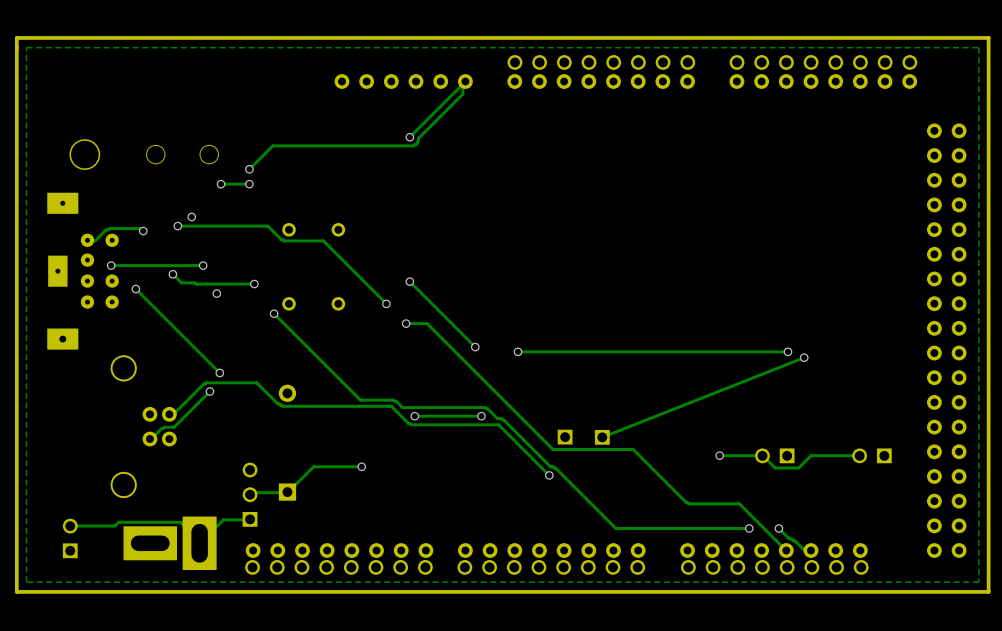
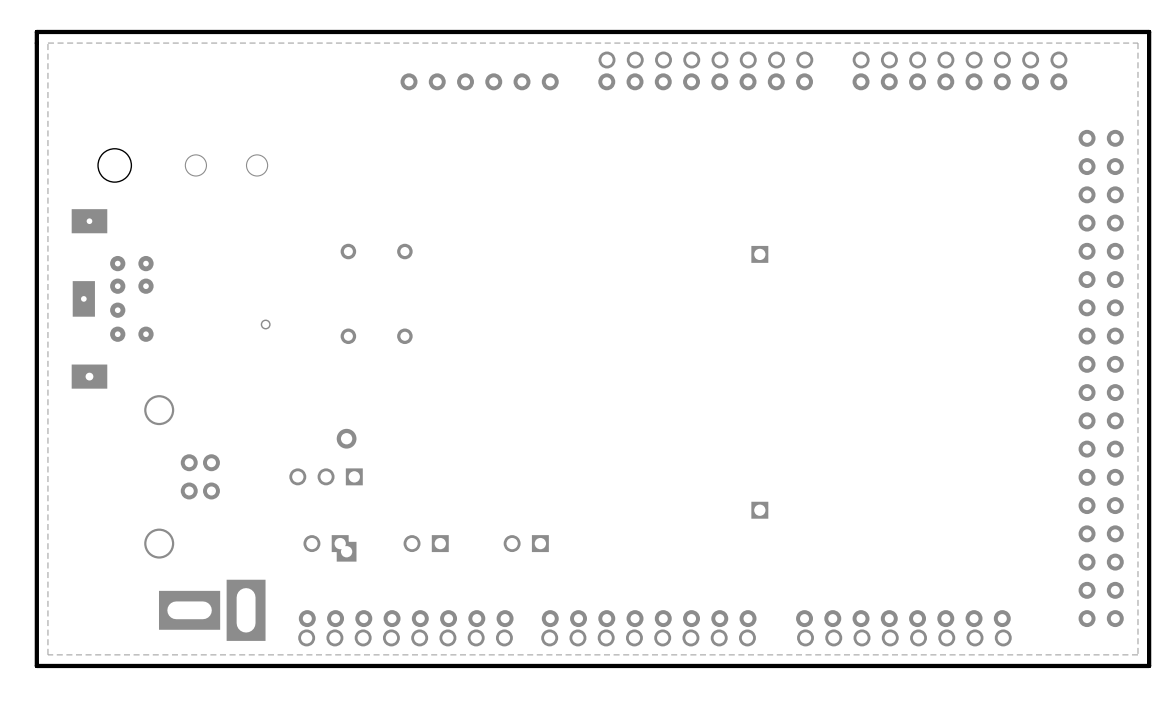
track: (465, 81) (409, 137) -> none
track: (462, 84) (462, 94) (418, 138) (417, 143) (413, 145) (272, 145) (249, 169) -> none
via: (409, 137) -> none
via: (249, 169) -> none
via: (221, 184) -> none
track: (249, 184) (221, 184) -> none
via: (249, 184) -> none
part footprint: [47, 192, 119, 350] -> [71, 209, 154, 389]
via: (191, 217) -> none
track: (177, 226) (267, 226) (283, 240) (323, 240) (386, 303) -> none
via: (177, 226) -> none
track: (143, 231) (140, 228) (109, 228) (95, 240) (87, 240) -> none
via: (143, 231) -> none
part: none -> (759, 254)
via: (111, 265) -> none
track: (203, 265) (111, 265) -> none
via: (203, 265) -> none
track: (172, 274) (181, 282) (254, 284) -> none
via: (172, 274) -> none
track: (409, 281) (475, 347) -> none
via: (409, 281) -> none
via: (254, 284) -> none
track: (135, 289) (219, 372) -> none
via: (135, 289) -> none
via: (386, 303) -> none
track: (274, 313) (360, 400) (393, 400) (402, 407) (487, 408) (497, 418) (503, 419) (550, 466) (555, 468) (615, 528) (749, 528) -> none
via: (274, 313) -> none
track: (406, 323) (427, 323) (553, 449) (633, 449) (686, 502) (739, 503) (786, 550) -> none
via: (406, 323) -> none
via: (475, 347) -> none
via: (518, 351) -> none
track: (787, 351) (518, 351) -> none
via: (787, 351) -> none
track: (804, 357) (602, 437) -> none
via: (804, 357) -> none
via: (219, 372) -> none
track: (209, 391) (174, 427) (164, 427) (149, 439) -> none
via: (209, 391) -> none
track: (169, 414) (172, 414) (206, 382) (256, 382) (282, 406) (391, 406) (411, 424) (498, 424) (549, 475) -> none
via: (414, 416) -> none
track: (481, 416) (414, 416) -> none
via: (481, 416) -> none
part: (565, 437) -> none
part: (602, 437) -> none
part: none -> (759, 510)
via: (719, 455) -> none
track: (762, 455) (719, 455) -> none
track: (762, 455) (775, 468) (798, 468) (810, 455) (859, 455) -> none
part: (774, 455) -> none
part: (872, 455) -> none
track: (361, 466) (313, 466) (287, 492) -> none
via: (361, 466) -> none
via: (549, 475) -> none
part: none -> (326, 543)
part: none -> (426, 543)
part: none -> (526, 543)
track: (287, 492) (253, 492) (250, 494) -> none
part rotation: 0° (250, 494) -> 90° counterclockwise (326, 476)
part position: (250, 494) -> (326, 476)
track: (250, 519) (223, 519) (200, 543) -> none
track: (70, 526) (114, 526) (118, 522) (181, 522) (200, 543) -> none
via: (749, 528) -> none
track: (778, 528) (804, 550) (810, 550) -> none
via: (778, 528) -> none
part: (70, 538) -> none

